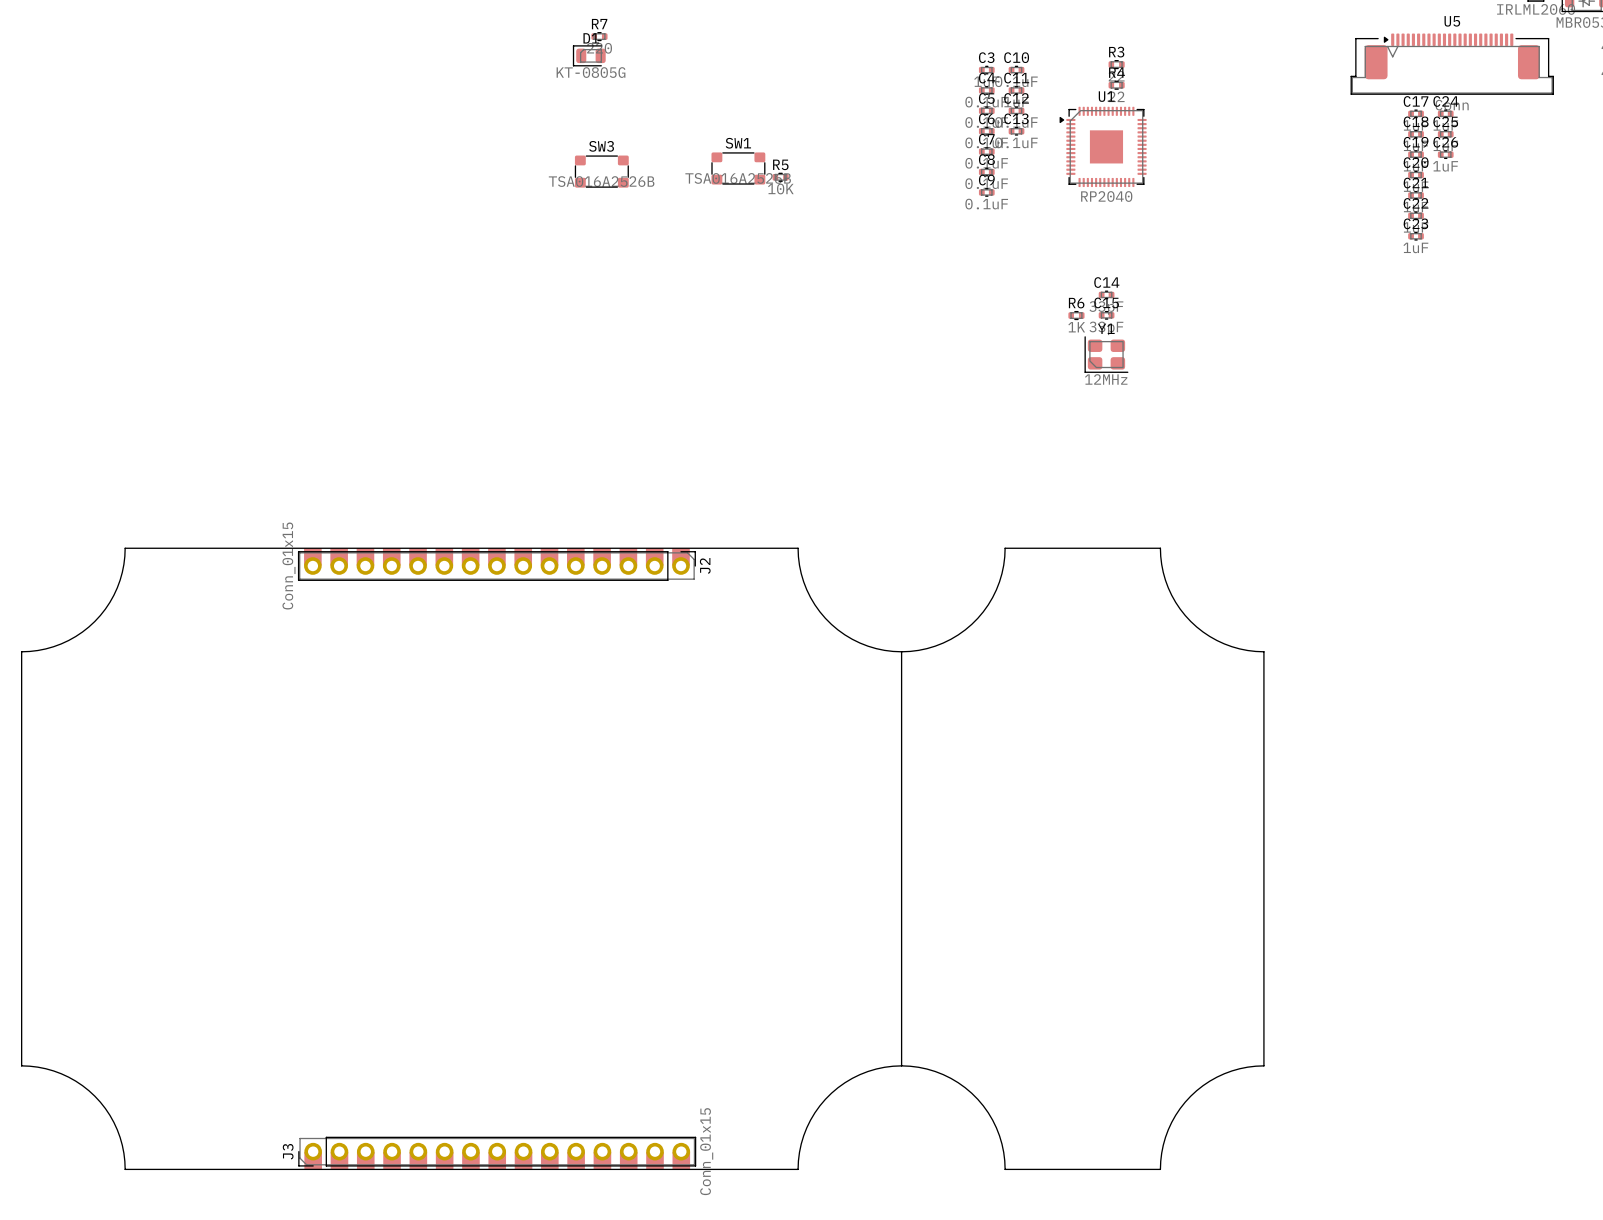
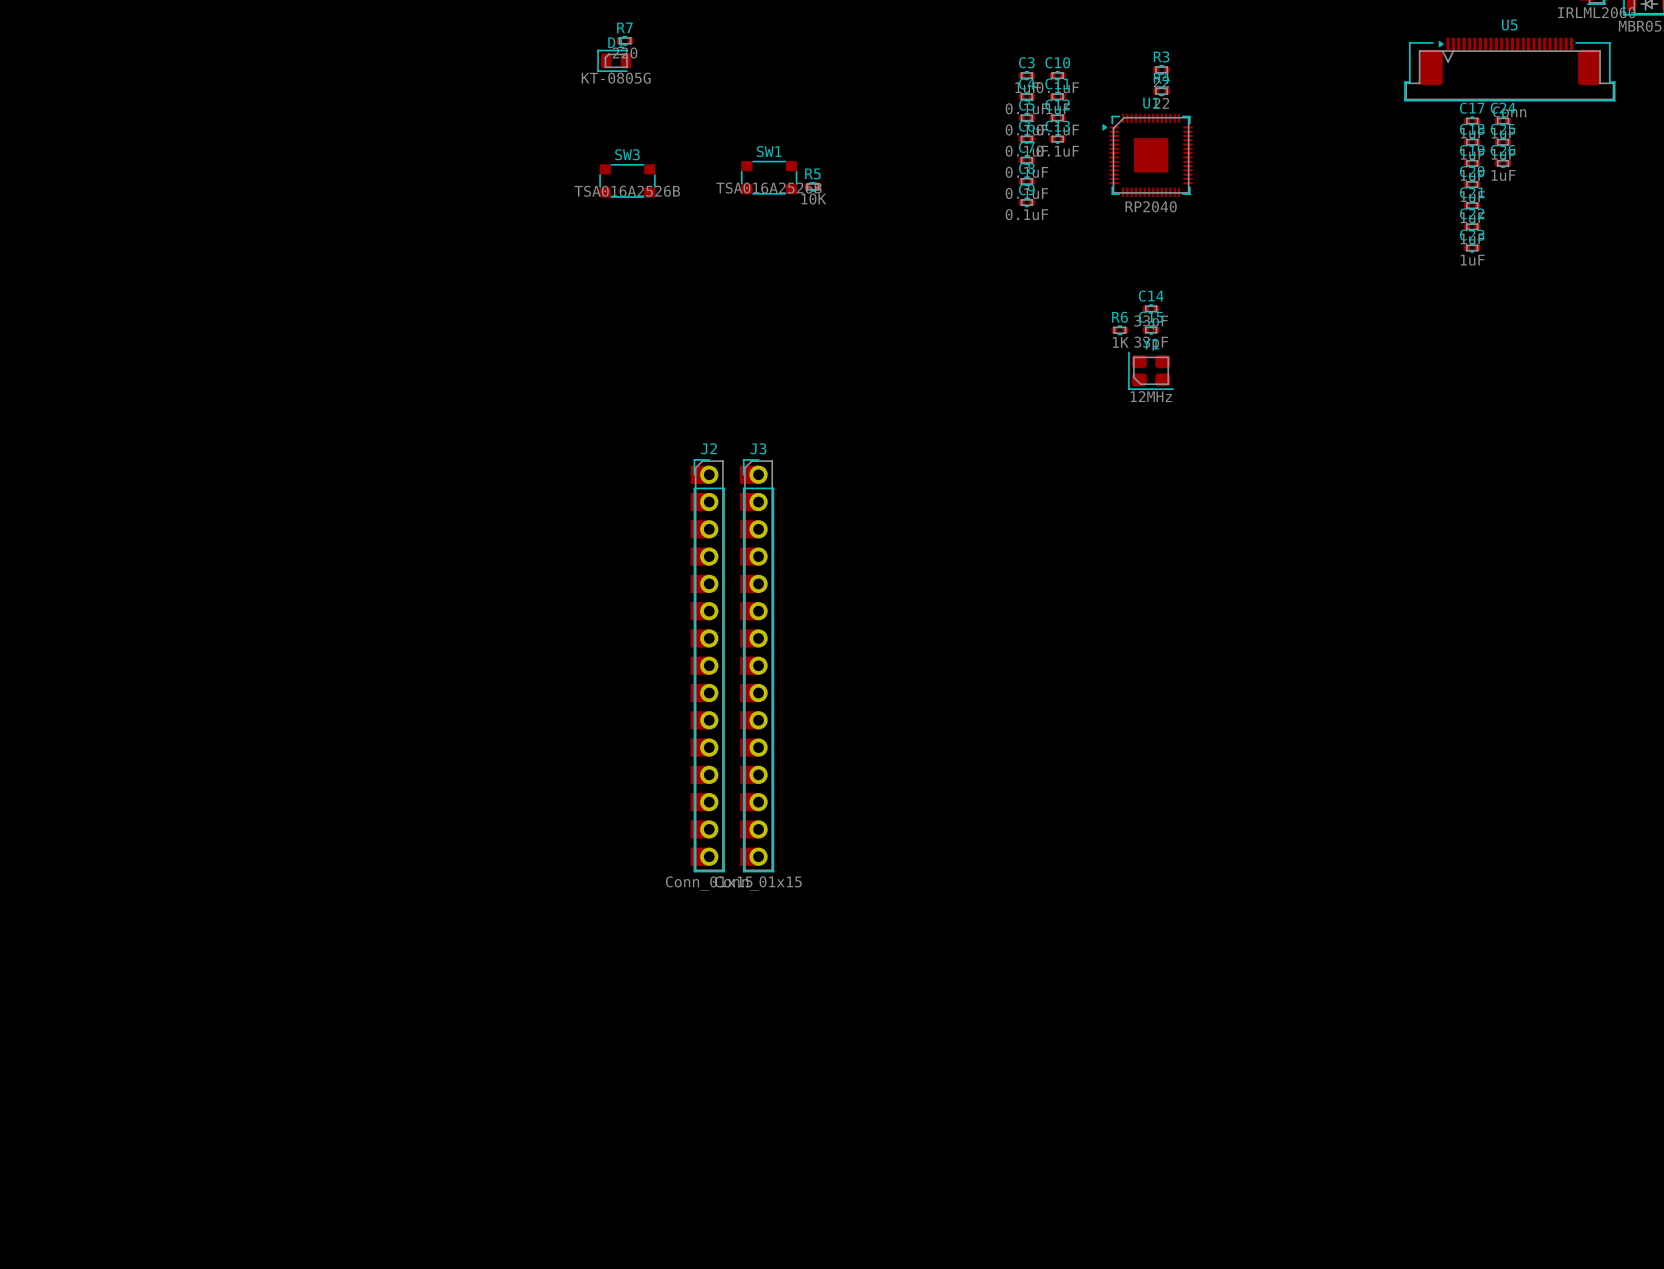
board edge: (125, 548) (798, 548) (803, 581) (814, 604) (825, 618) (838, 629) (860, 643) (884, 650) (901, 651) (935, 646) (958, 634) (971, 624) (983, 611) (996, 589) (1003, 565) (1005, 548) (1160, 548) (1163, 572) (1168, 587) (1175, 602) (1190, 621) (1209, 636) (1224, 643) (1247, 650) (1263, 651) (1263, 1065) (1239, 1068) (1224, 1073) (1203, 1085) (1190, 1096) (1180, 1108) (1168, 1129) (1161, 1153) (1160, 1169) (1005, 1169) (1001, 1143) (996, 1127) (988, 1112) (971, 1093) (950, 1078) (935, 1071) (901, 1065) (867, 1071) (852, 1078) (831, 1093) (814, 1112) (806, 1127) (801, 1143) (798, 1169) (125, 1169) (123, 1153) (117, 1129) (109, 1115) (94, 1096) (75, 1081) (61, 1073) (45, 1068) (21, 1065) (21, 651) (45, 648) (61, 643) (82, 632) (94, 621) (105, 609) (117, 587) (122, 572) (125, 548) -> none
J2 rotation: 0° (496, 564) -> 90° counterclockwise (707, 665)
board edge: (901, 651) (901, 1065) -> none
J3 rotation: 0° (497, 1153) -> 90° clockwise (756, 665)
J3 position: (497, 1153) -> (756, 665)

